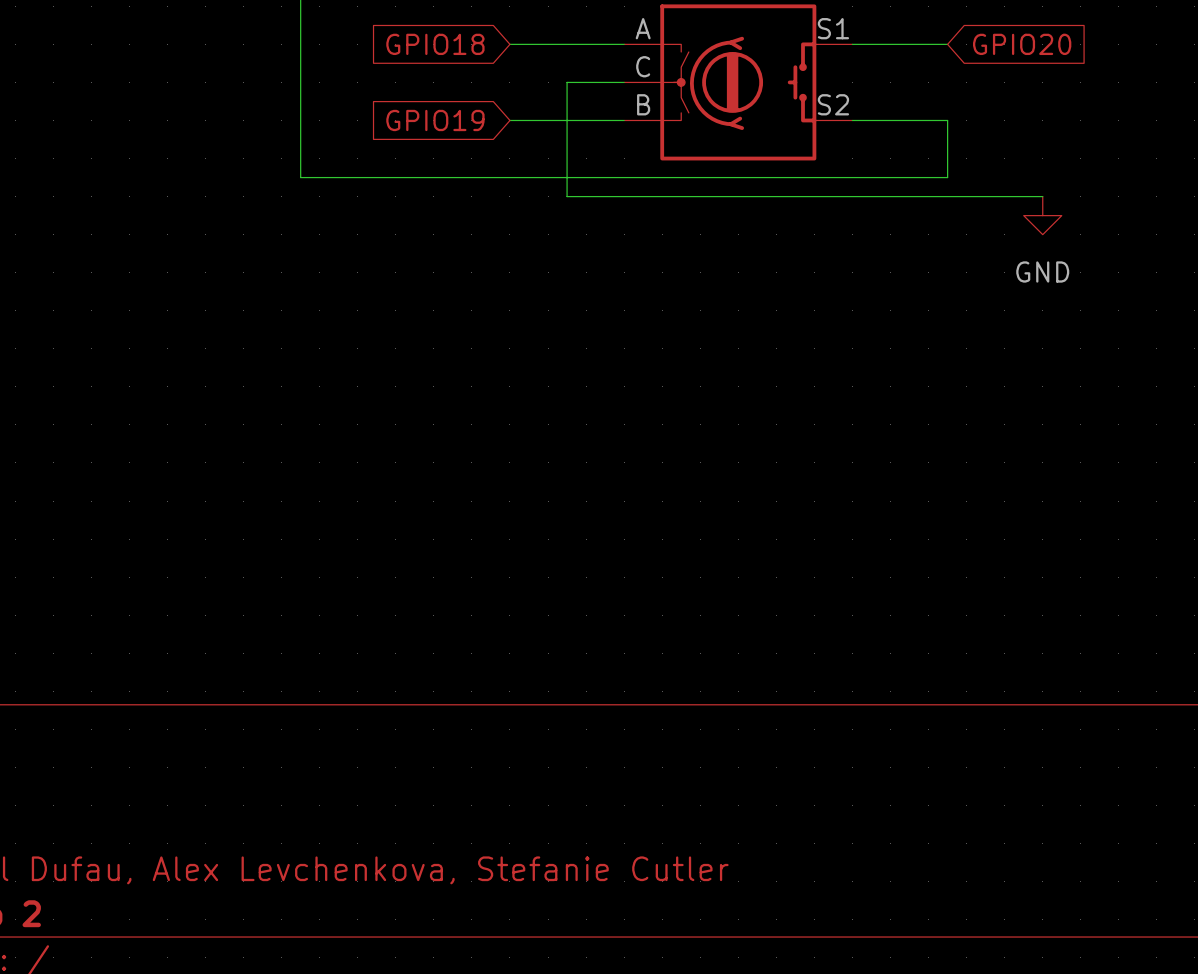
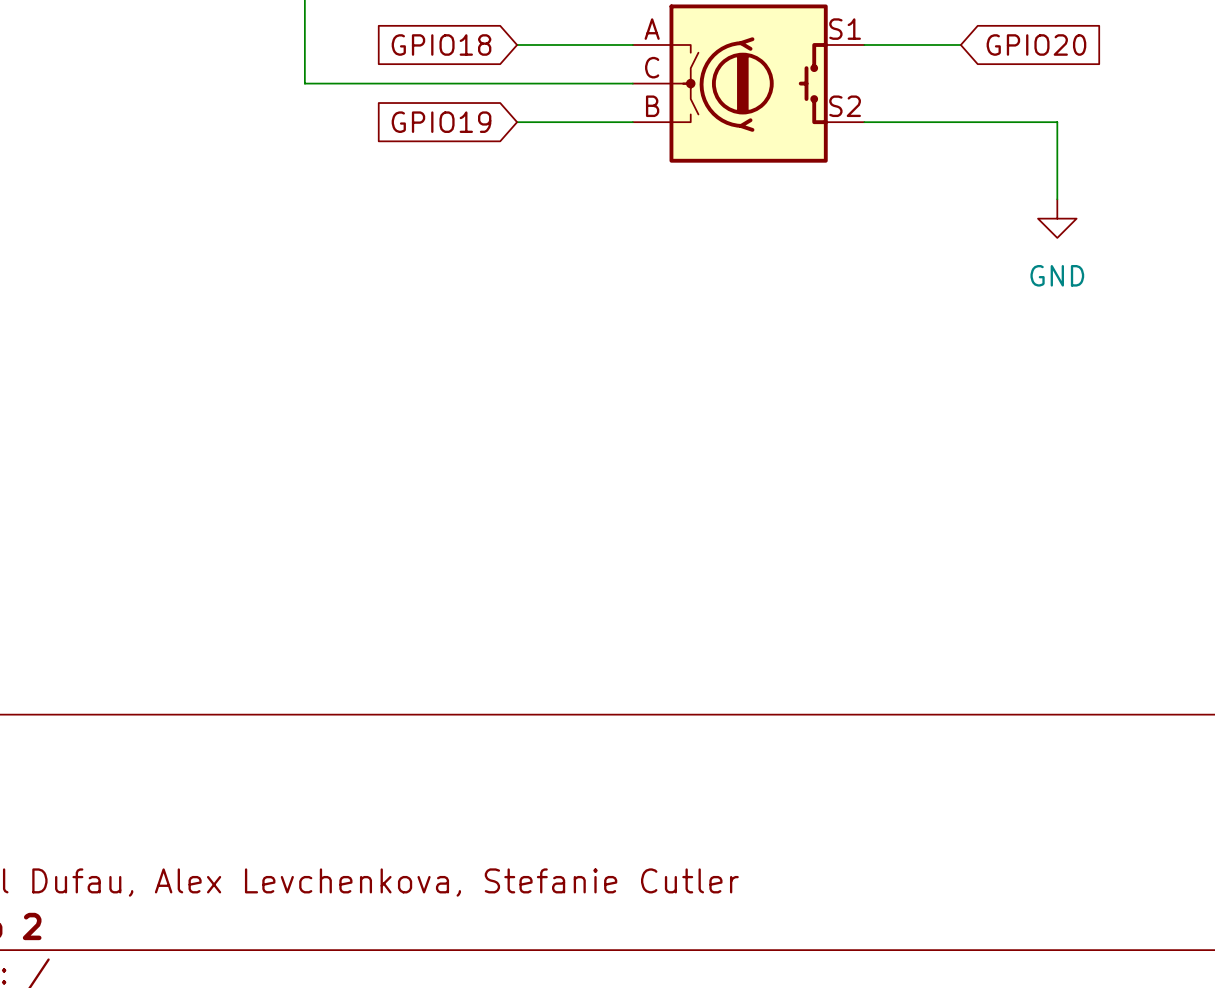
wire: (300, 82) (300, 177) (947, 177) (947, 120) -> (304, 83) (574, 83)
wire: (567, 82) (567, 196) (1042, 196) -> (960, 122) (1057, 122) (1057, 199)

